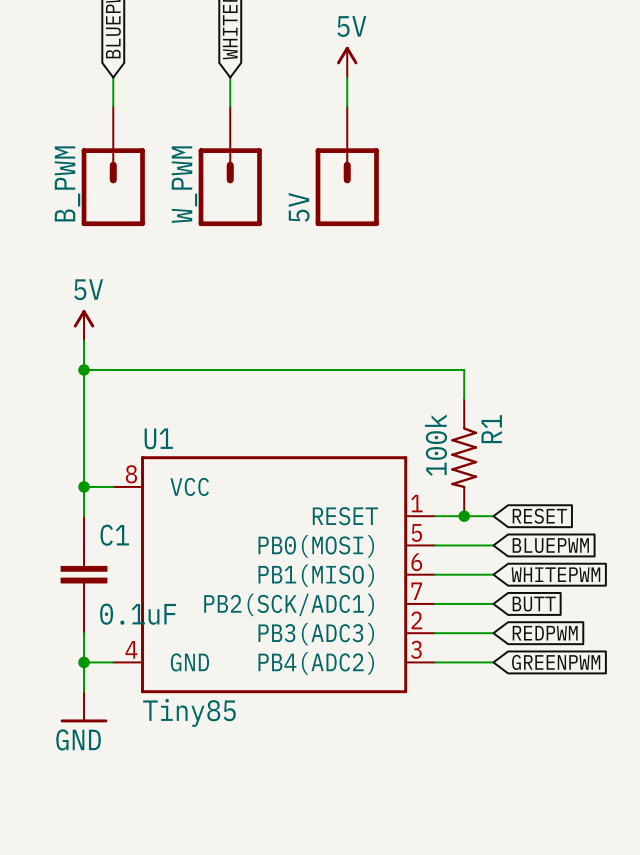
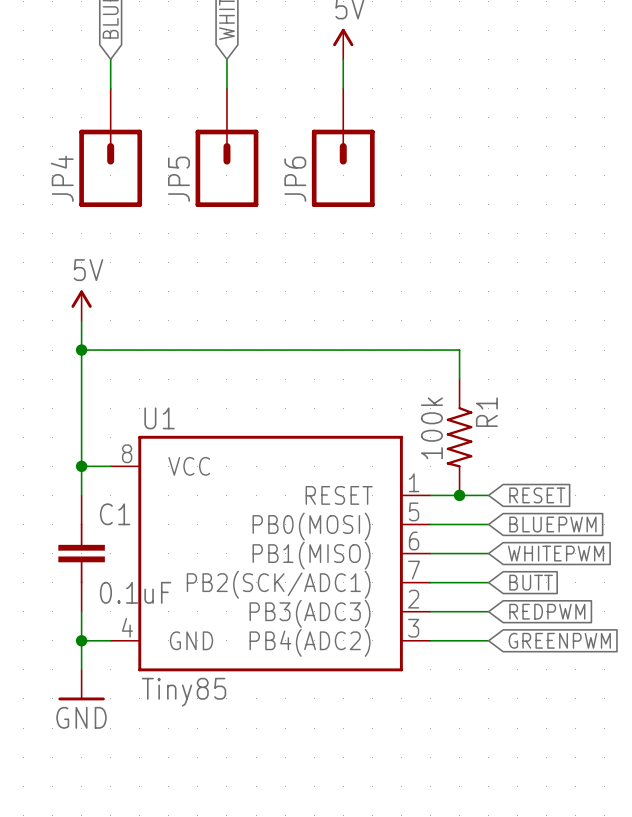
B_PWM name: B_PWM (67, 183) -> JP4 (62, 178)
W_PWM name: W_PWM (184, 184) -> JP5 (179, 179)
5V name: 5V (299, 207) -> JP6 (295, 179)

